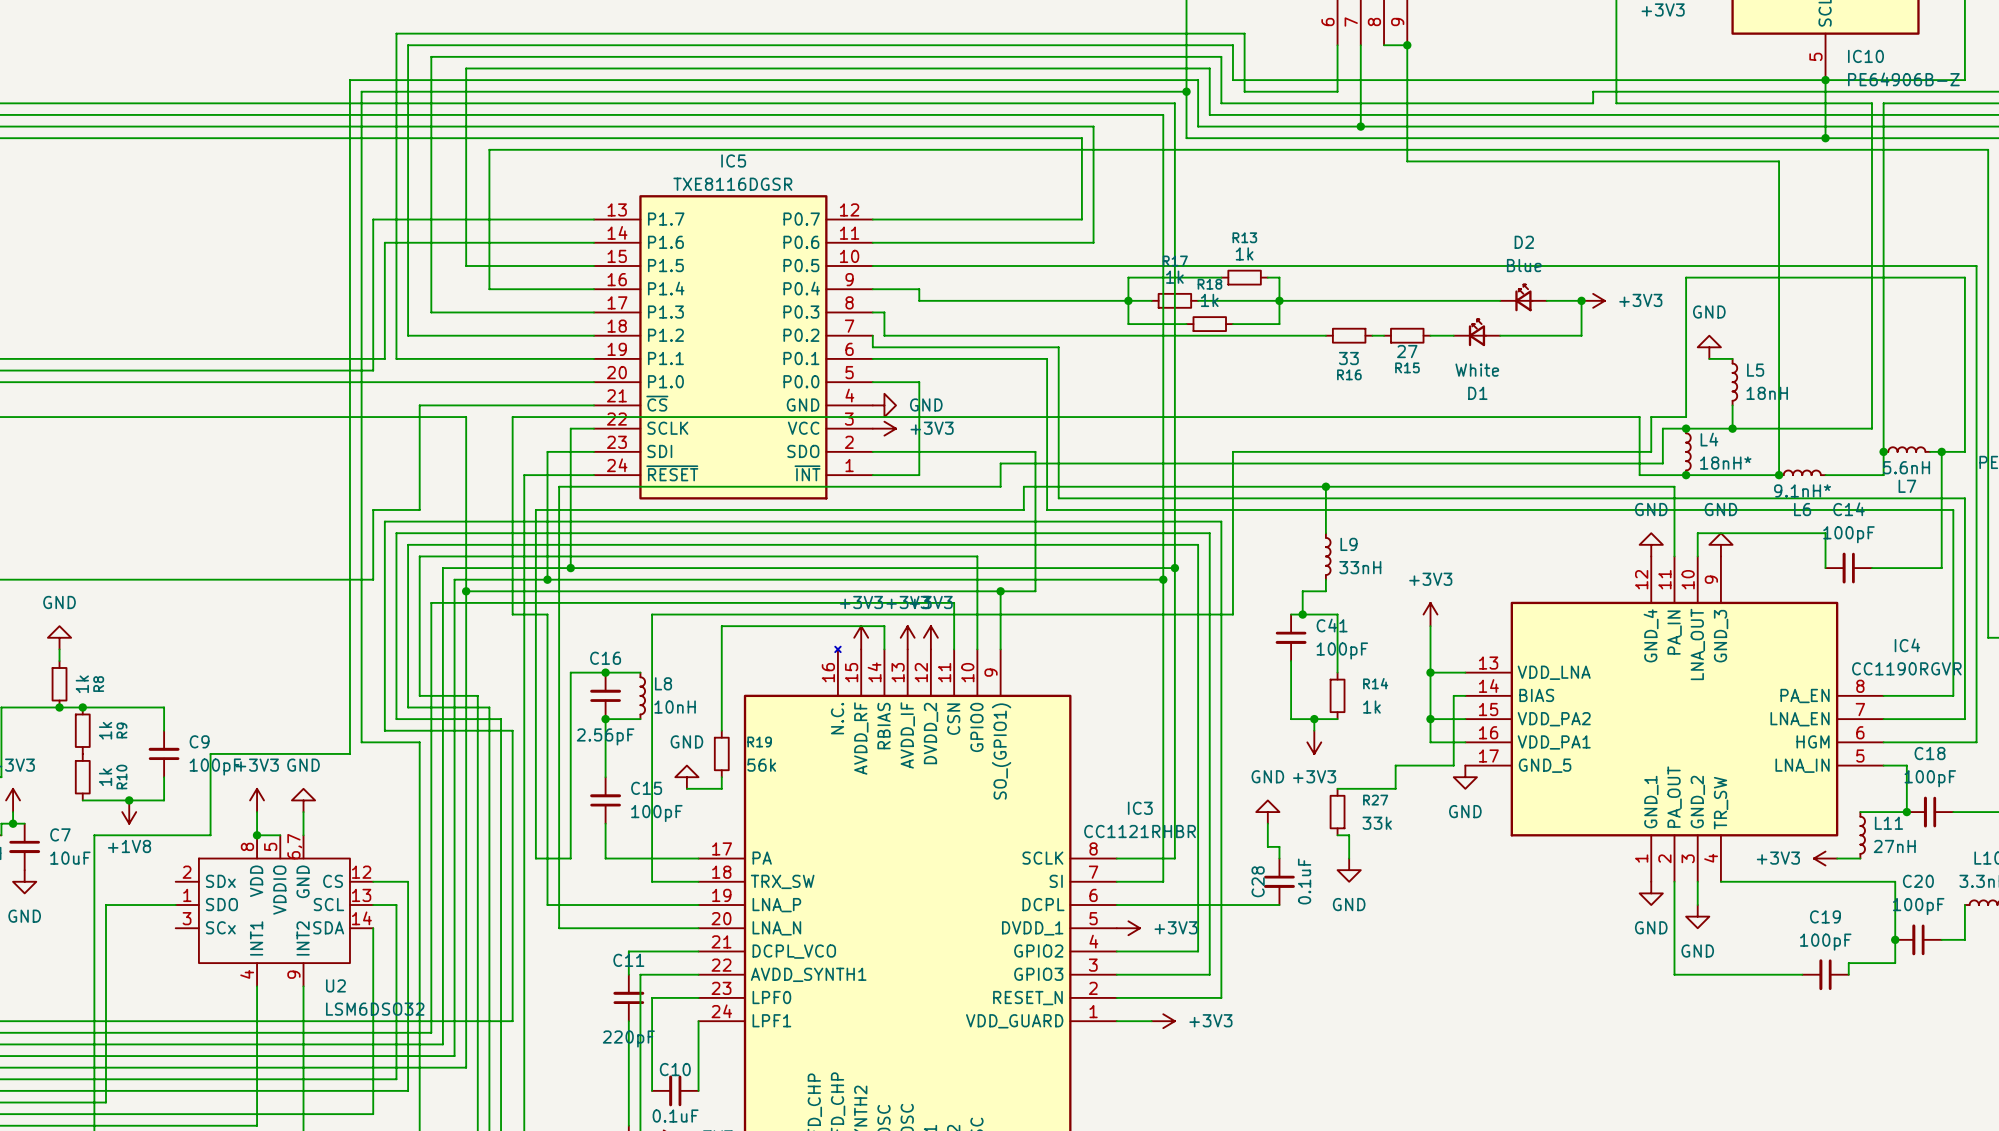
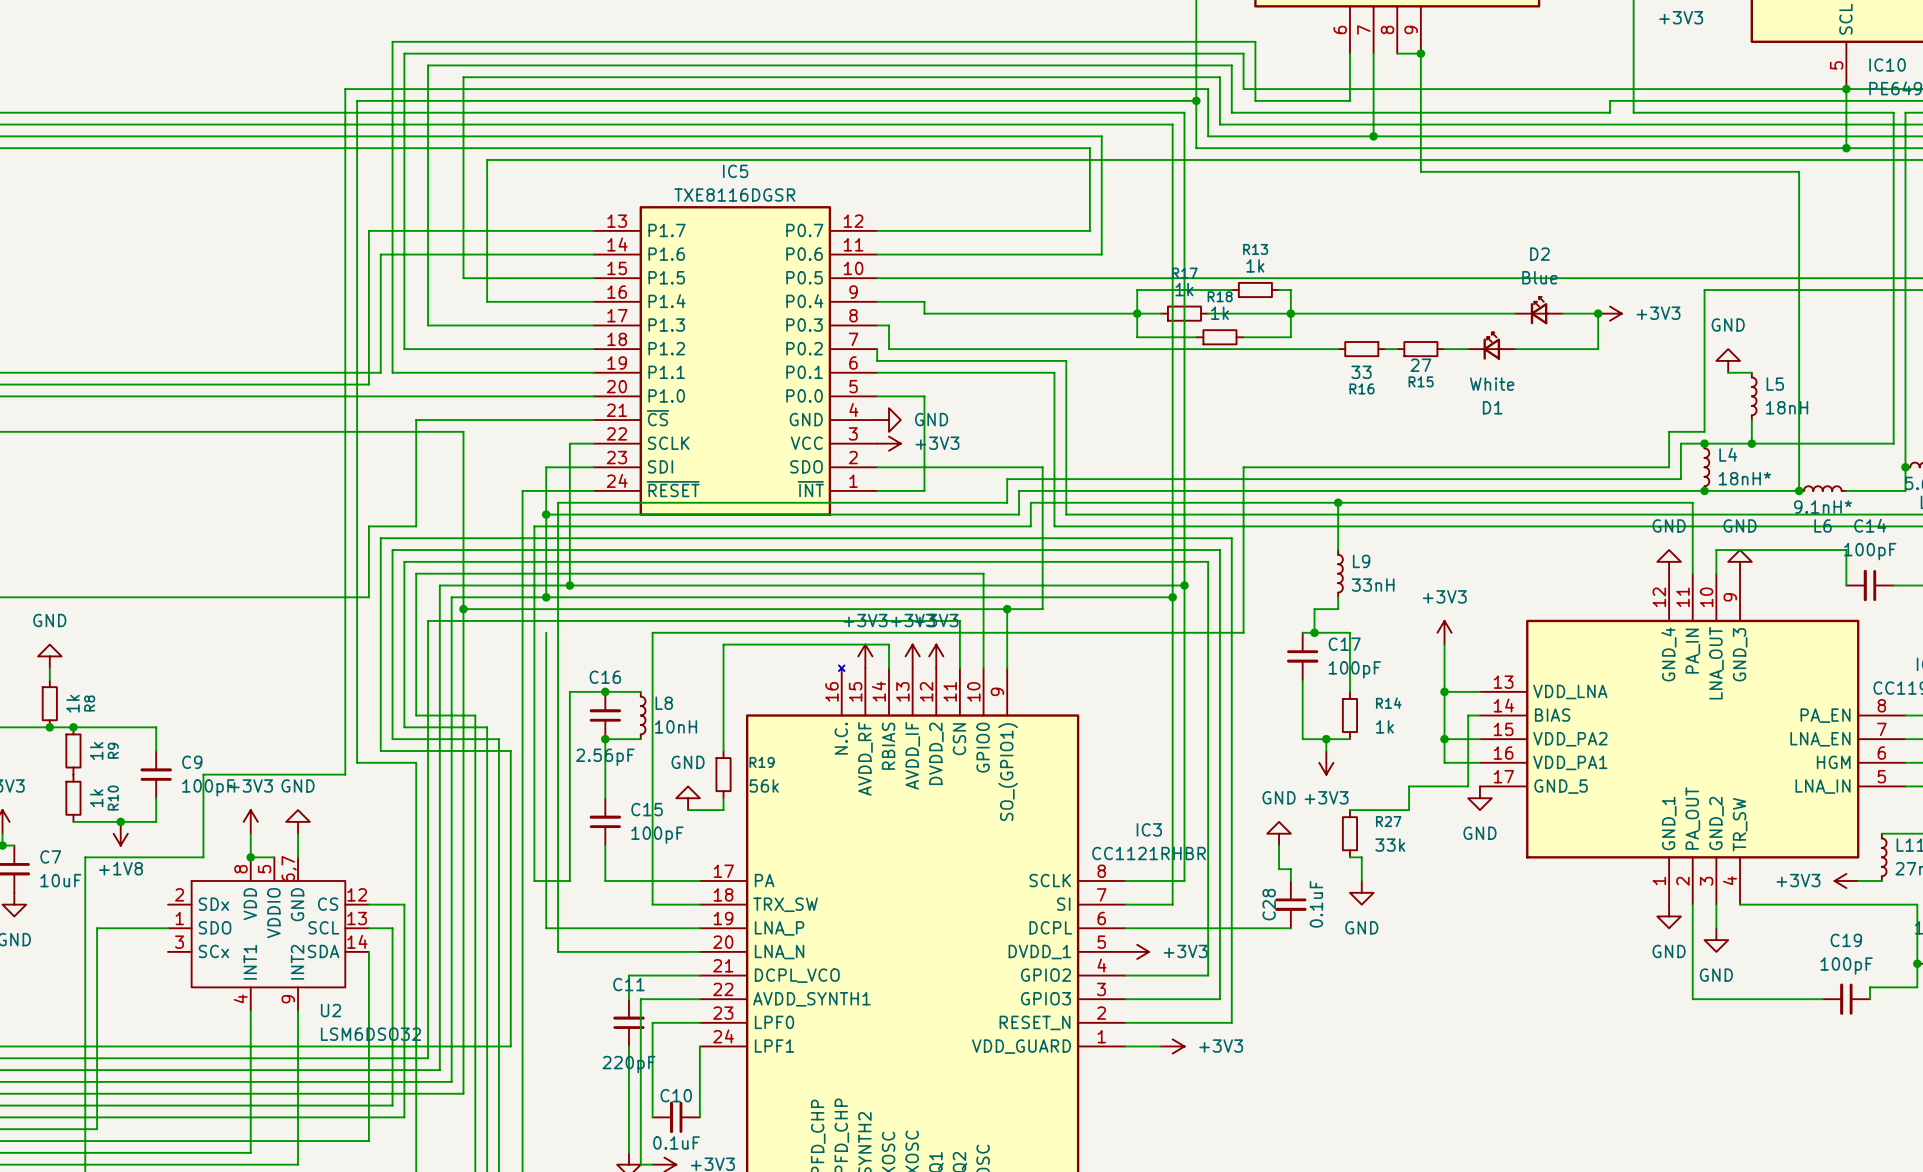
wire: (1639, 475) (1639, 417) (512, 417) (512, 614) (547, 614) -> (1657, 490) (1019, 490) (1019, 514) (546, 514)
junction: none -> (546, 514)
C41 name: C41 (1332, 625) -> C17 (1344, 644)

